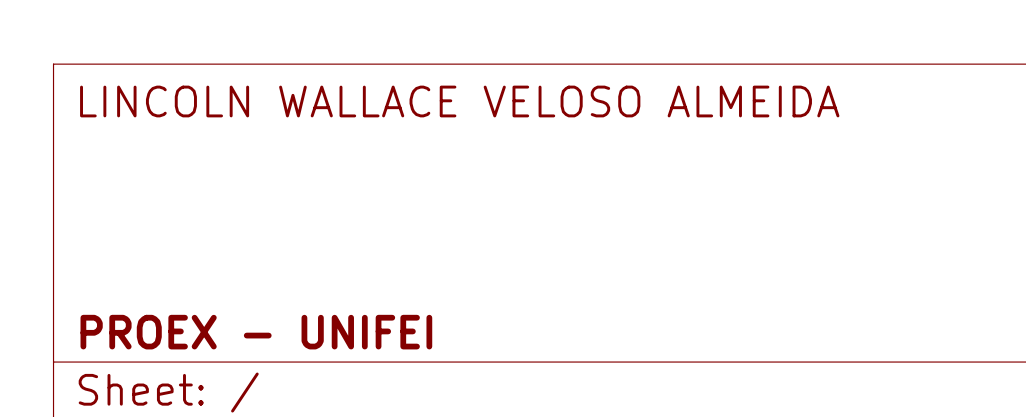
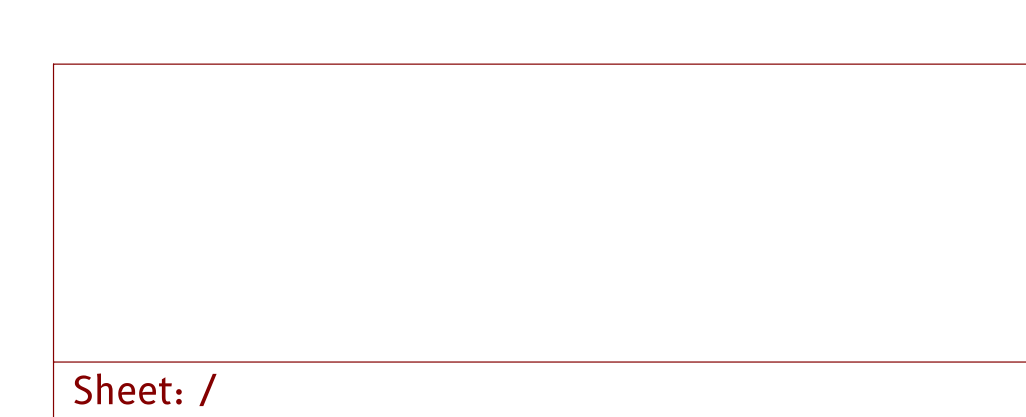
title block: LINCOLN WALLACE VELOSO ALMEIDA (459, 101) -> none
title block: PROEX - UNIFEI (256, 332) -> none

